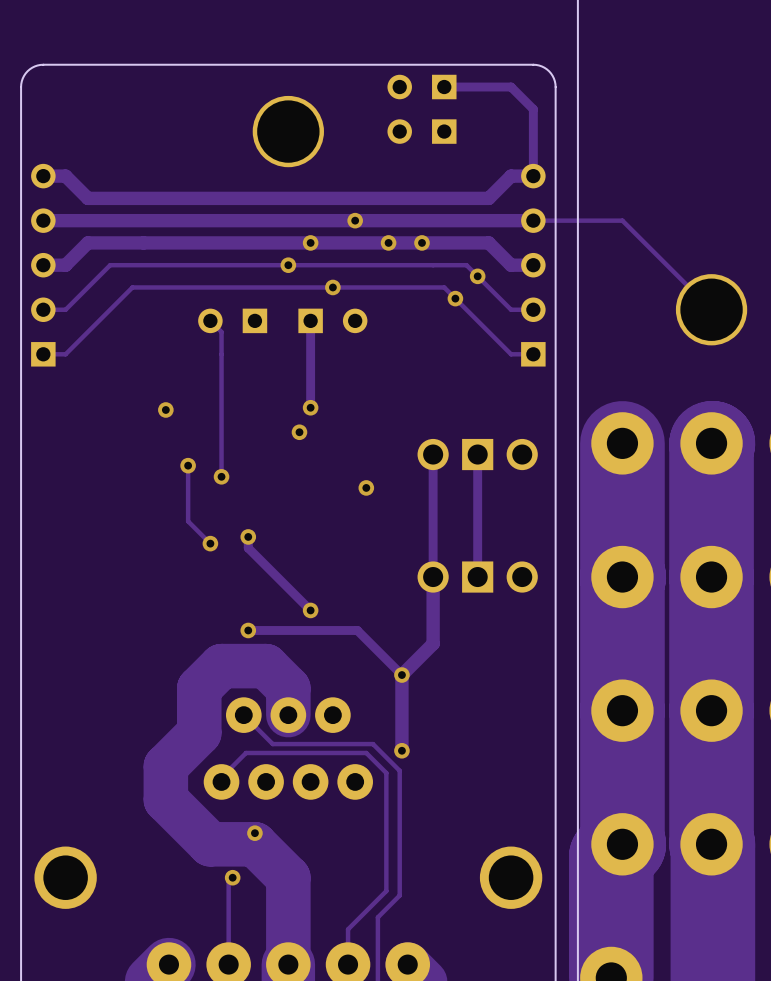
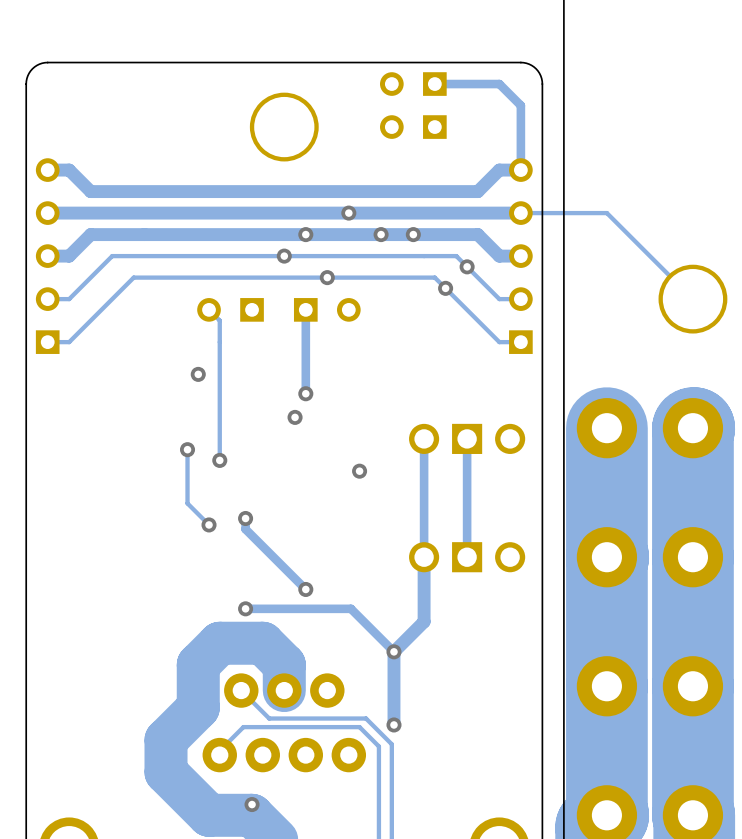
via position: (165, 409) -> (198, 374)

